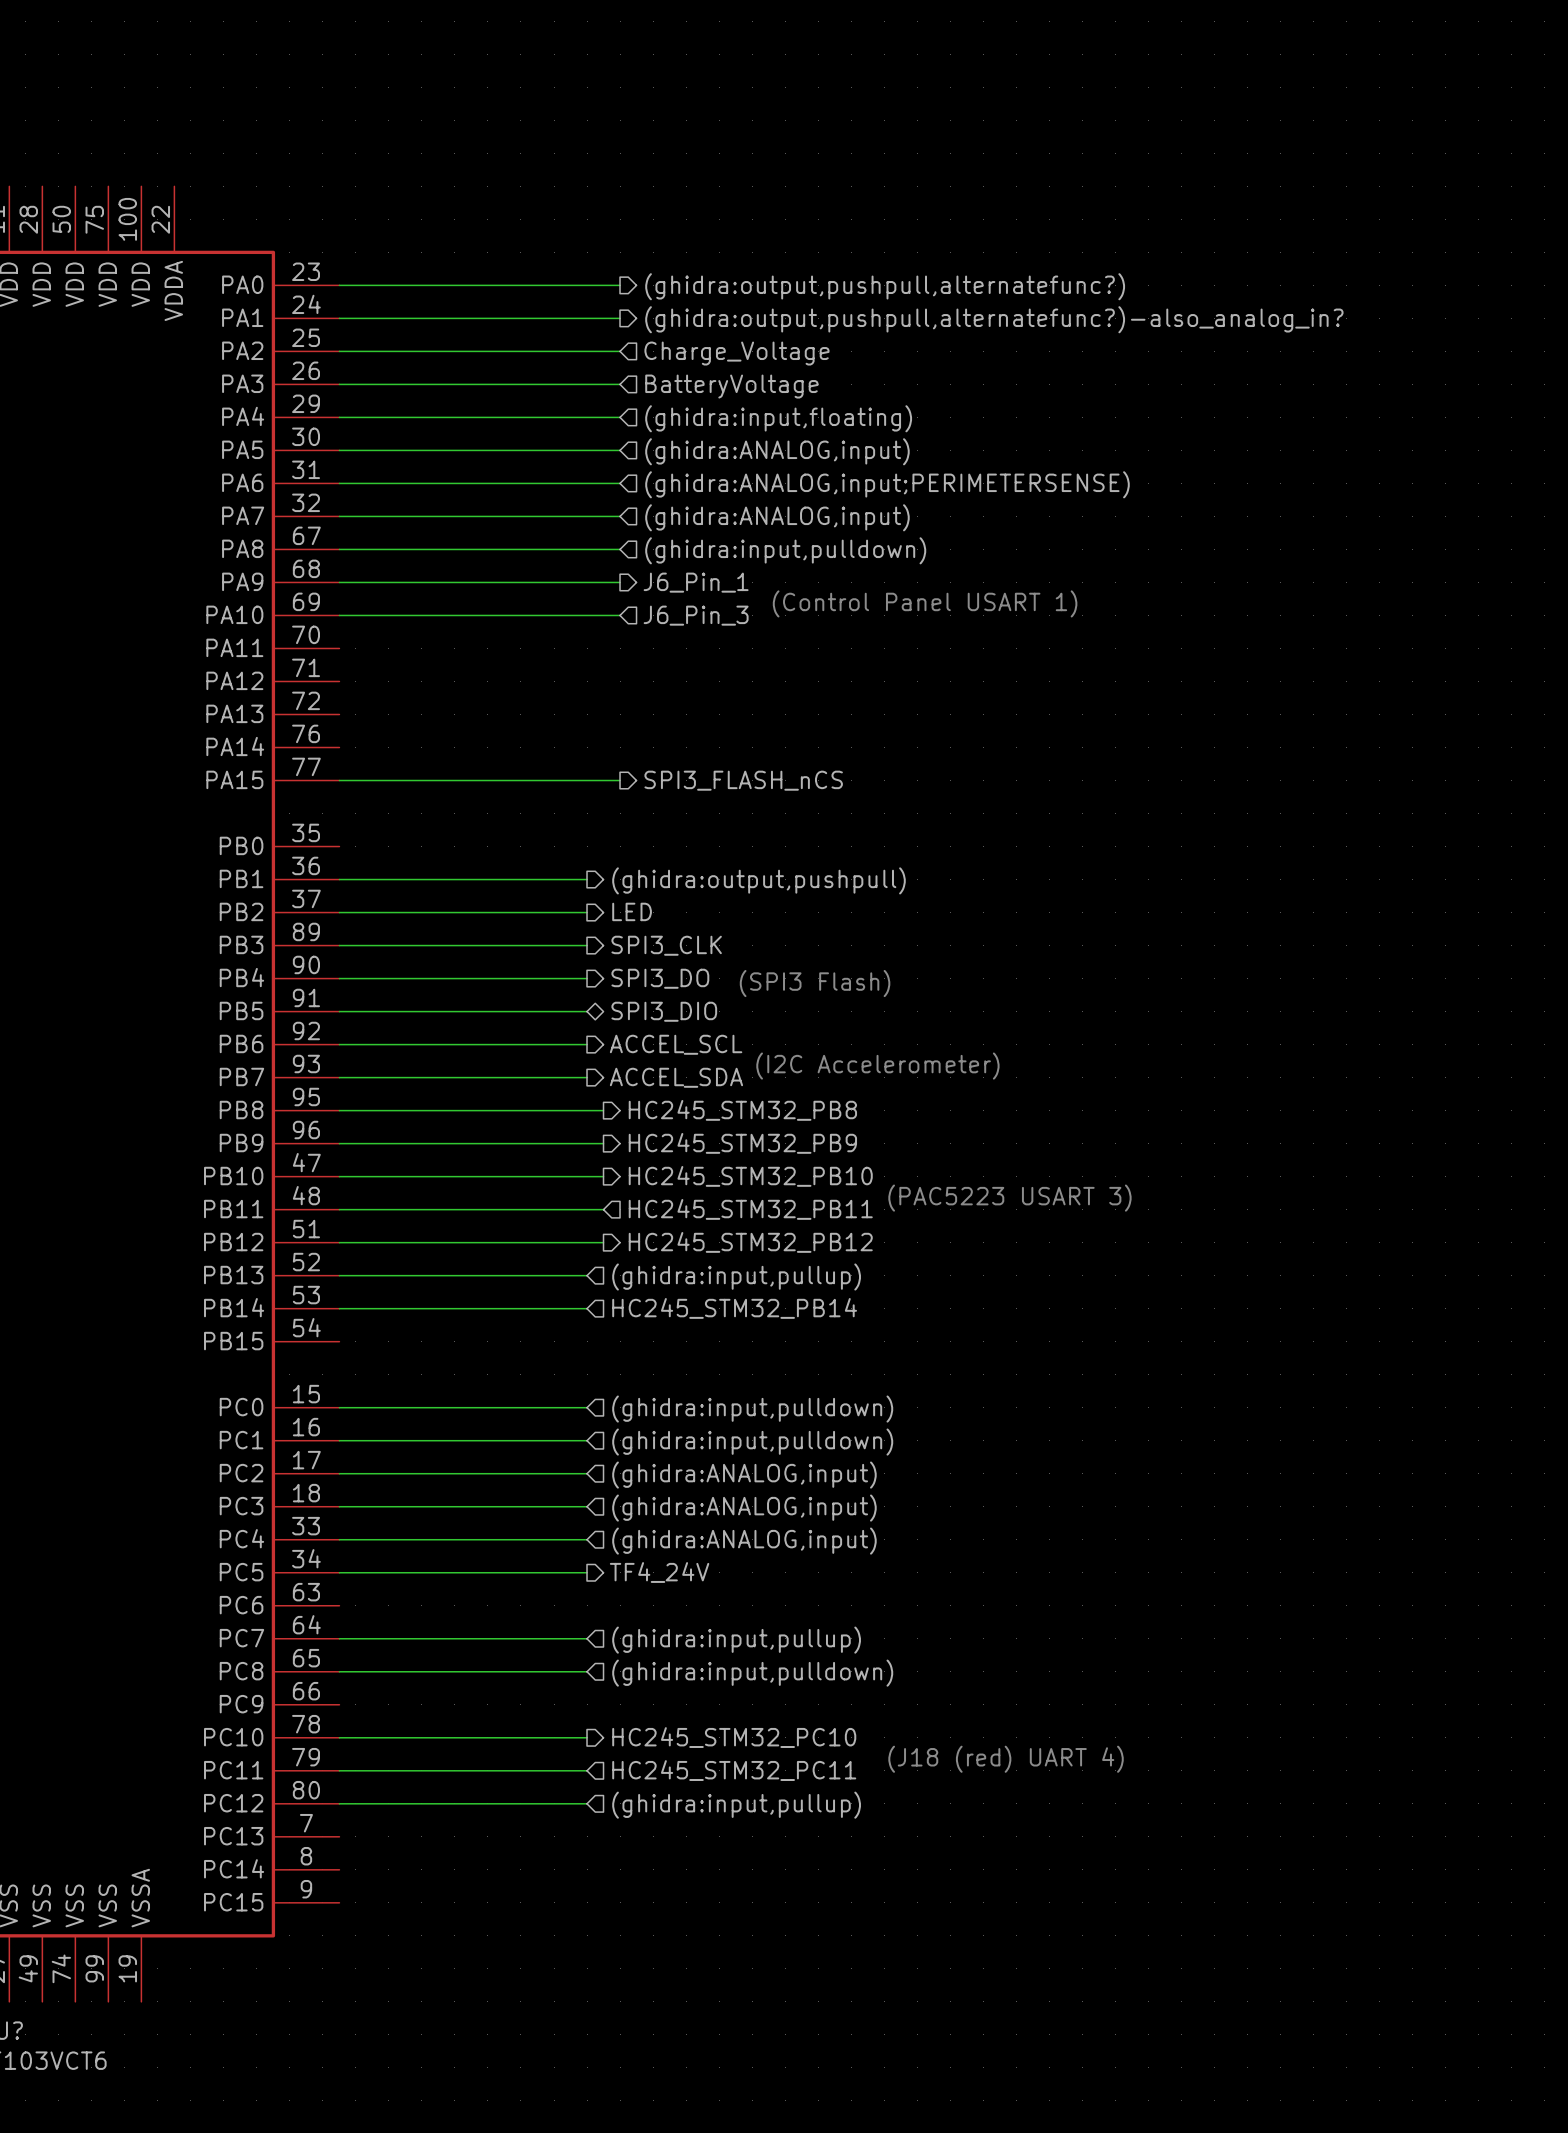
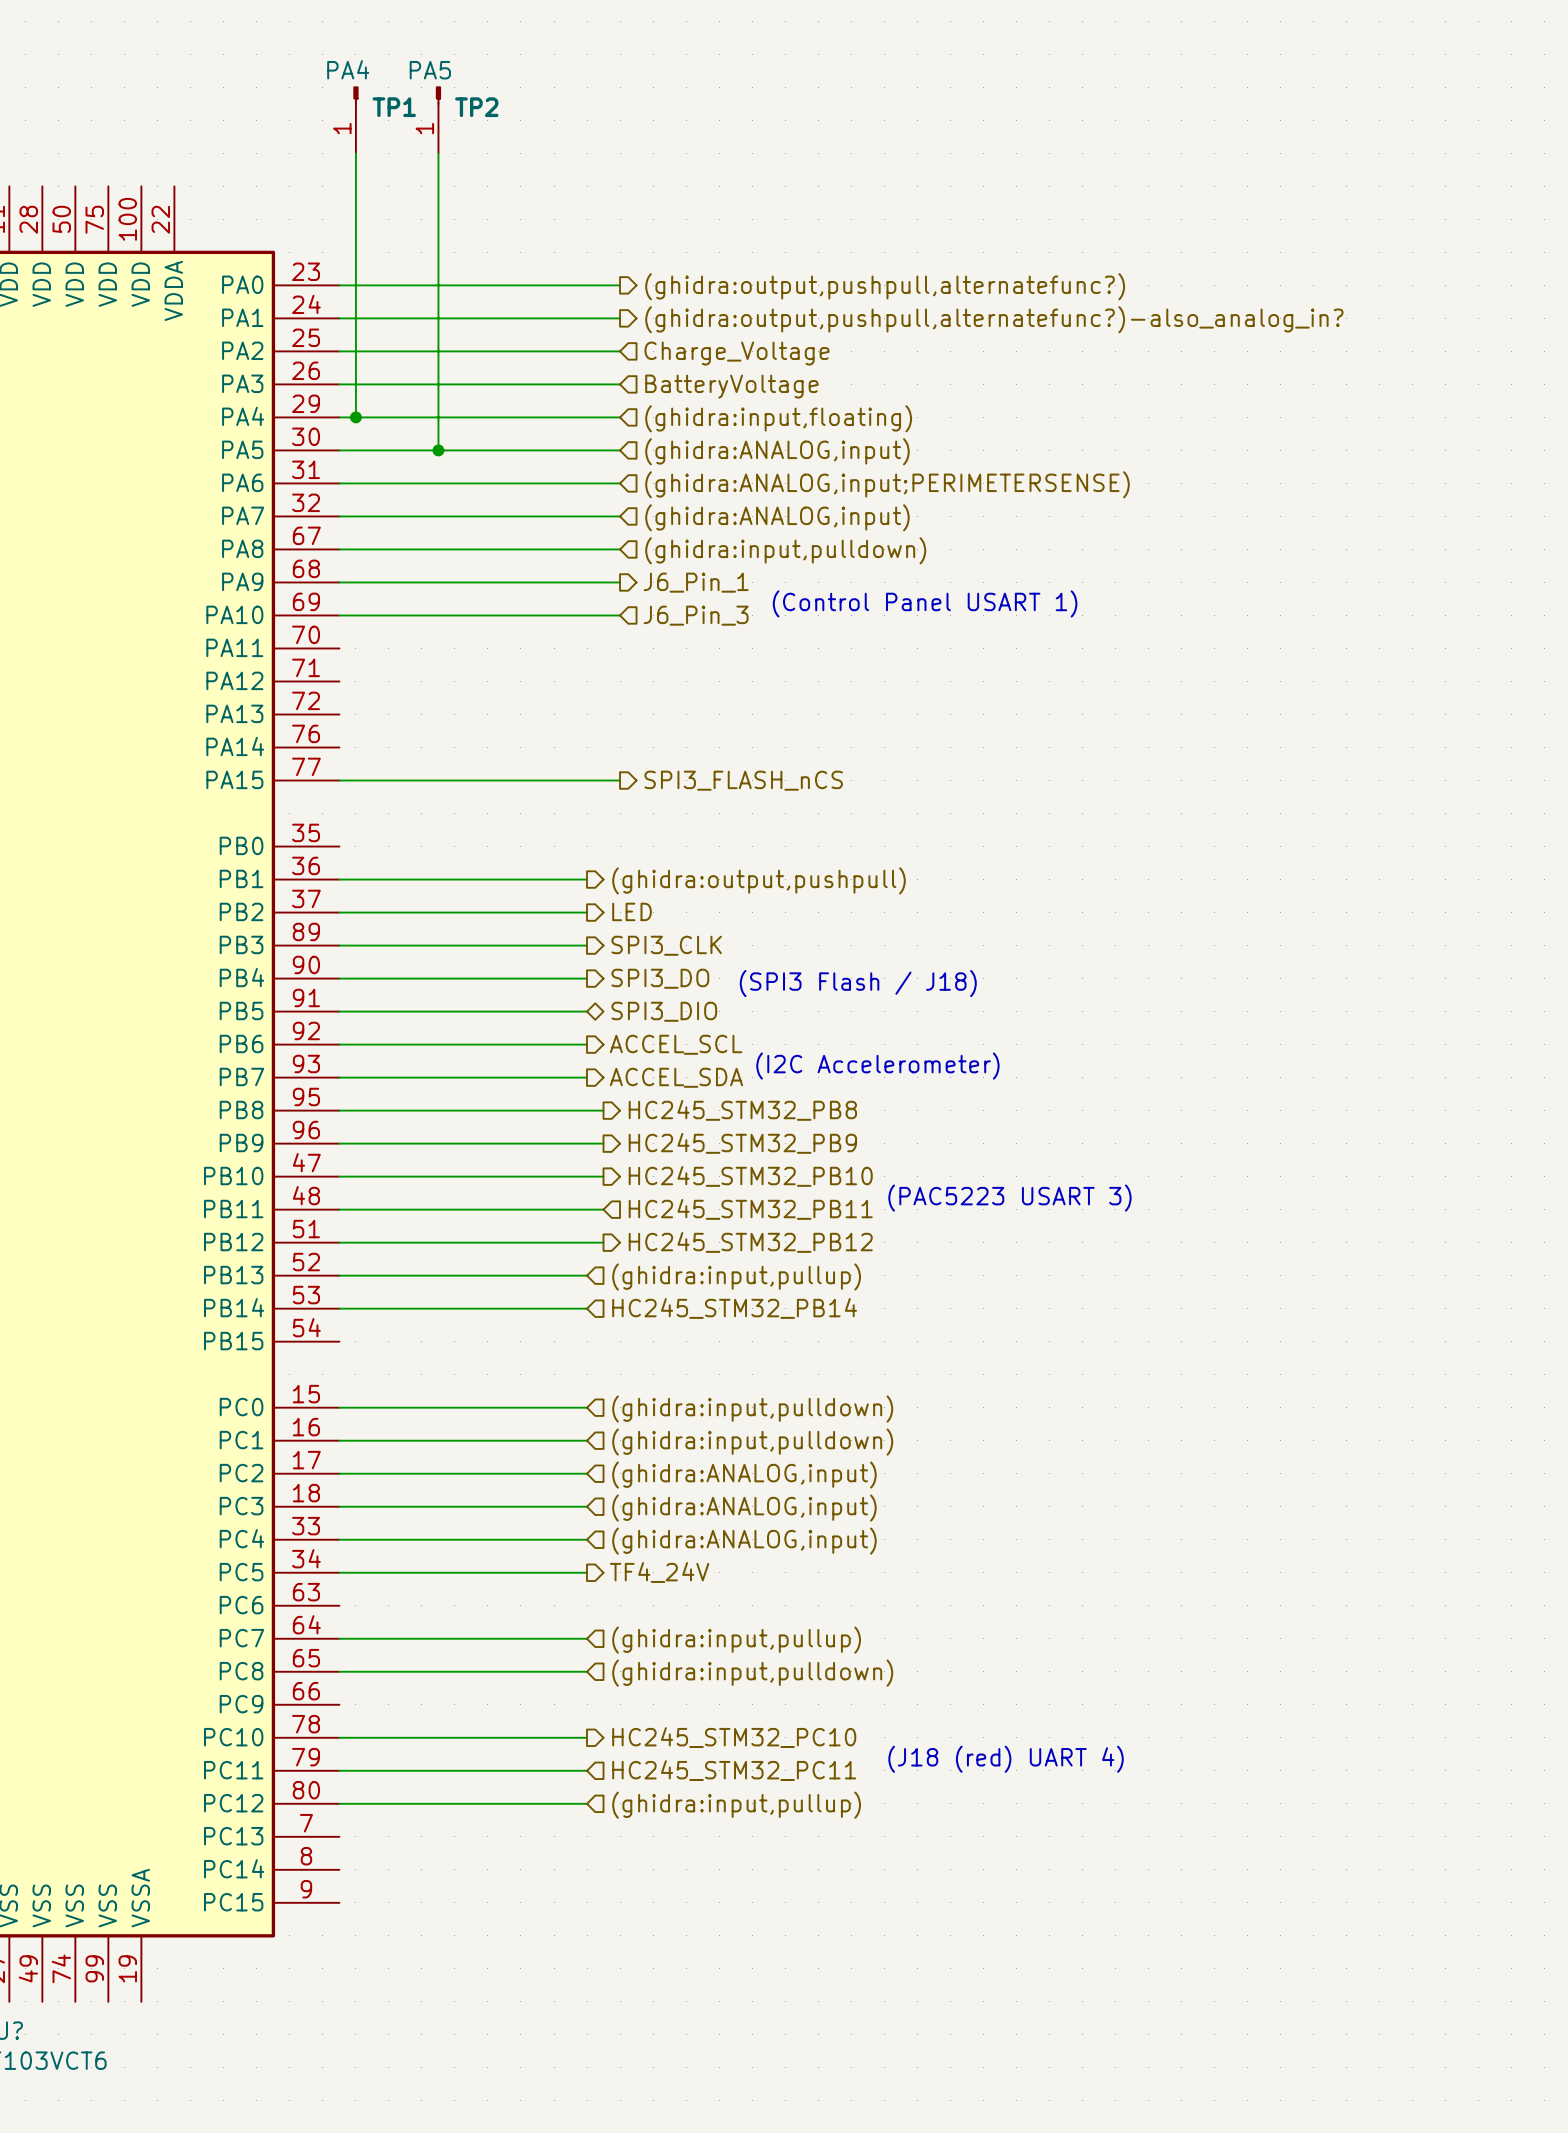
TP1: none -> PA4 (355, 119)
TP2: none -> PA5 (438, 119)
wire: none -> (355, 153) (355, 417)
wire: none -> (438, 153) (438, 450)
junction: none -> (355, 417)
junction: none -> (438, 450)
text: (SPI3 Flash) (815, 983) -> (SPI3 Flash / J18) (858, 983)

